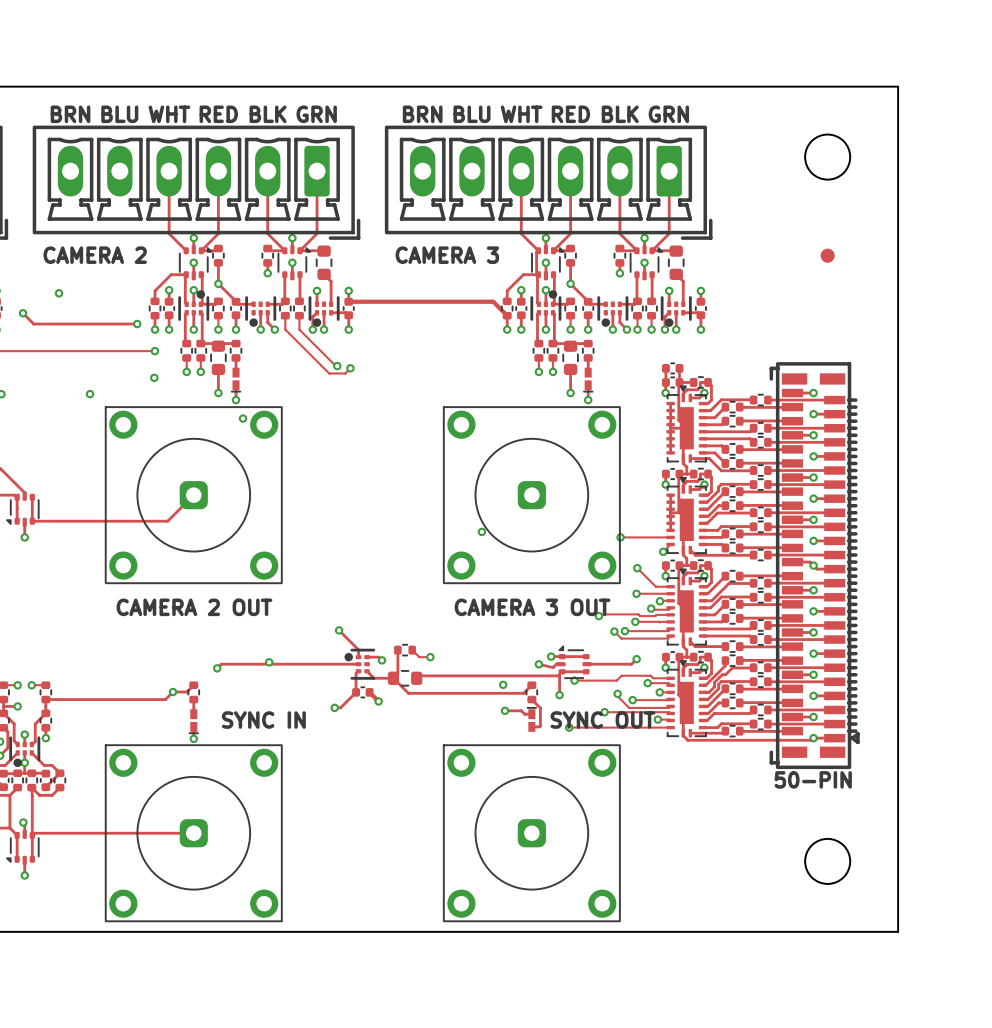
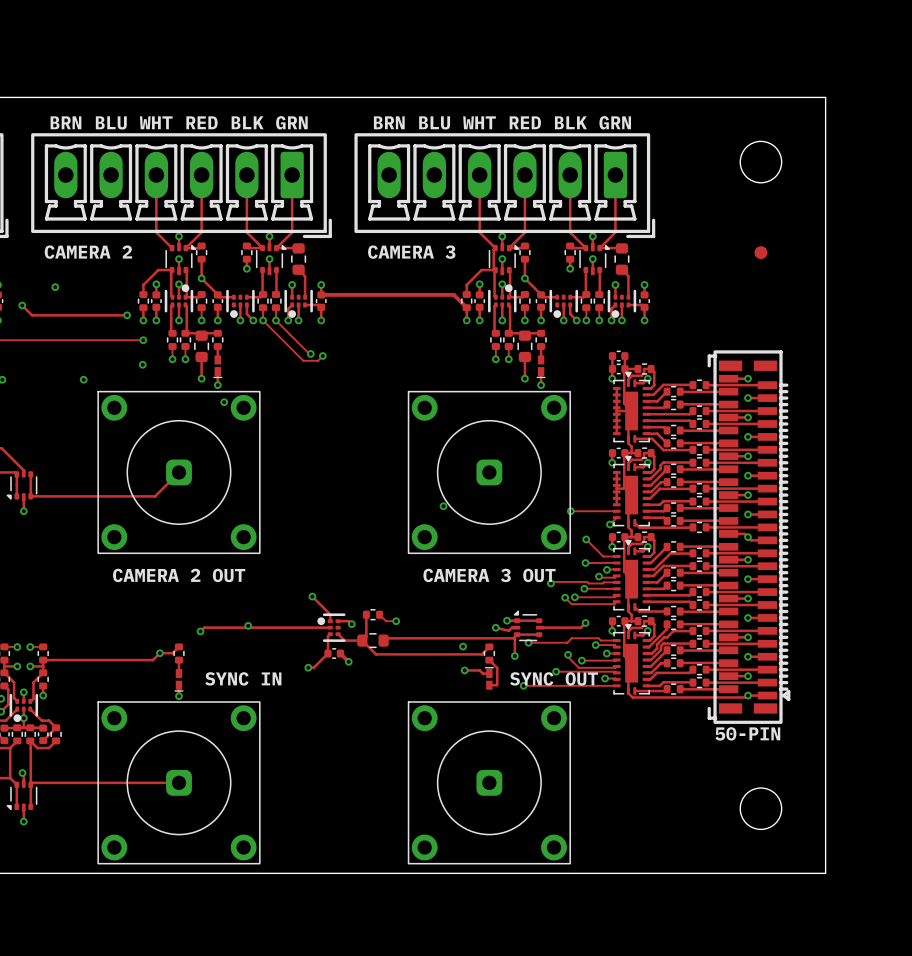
via: none -> (263, 320)
via: none -> (275, 320)
track: none -> (30, 666) (43, 666)
via: none -> (30, 666)

